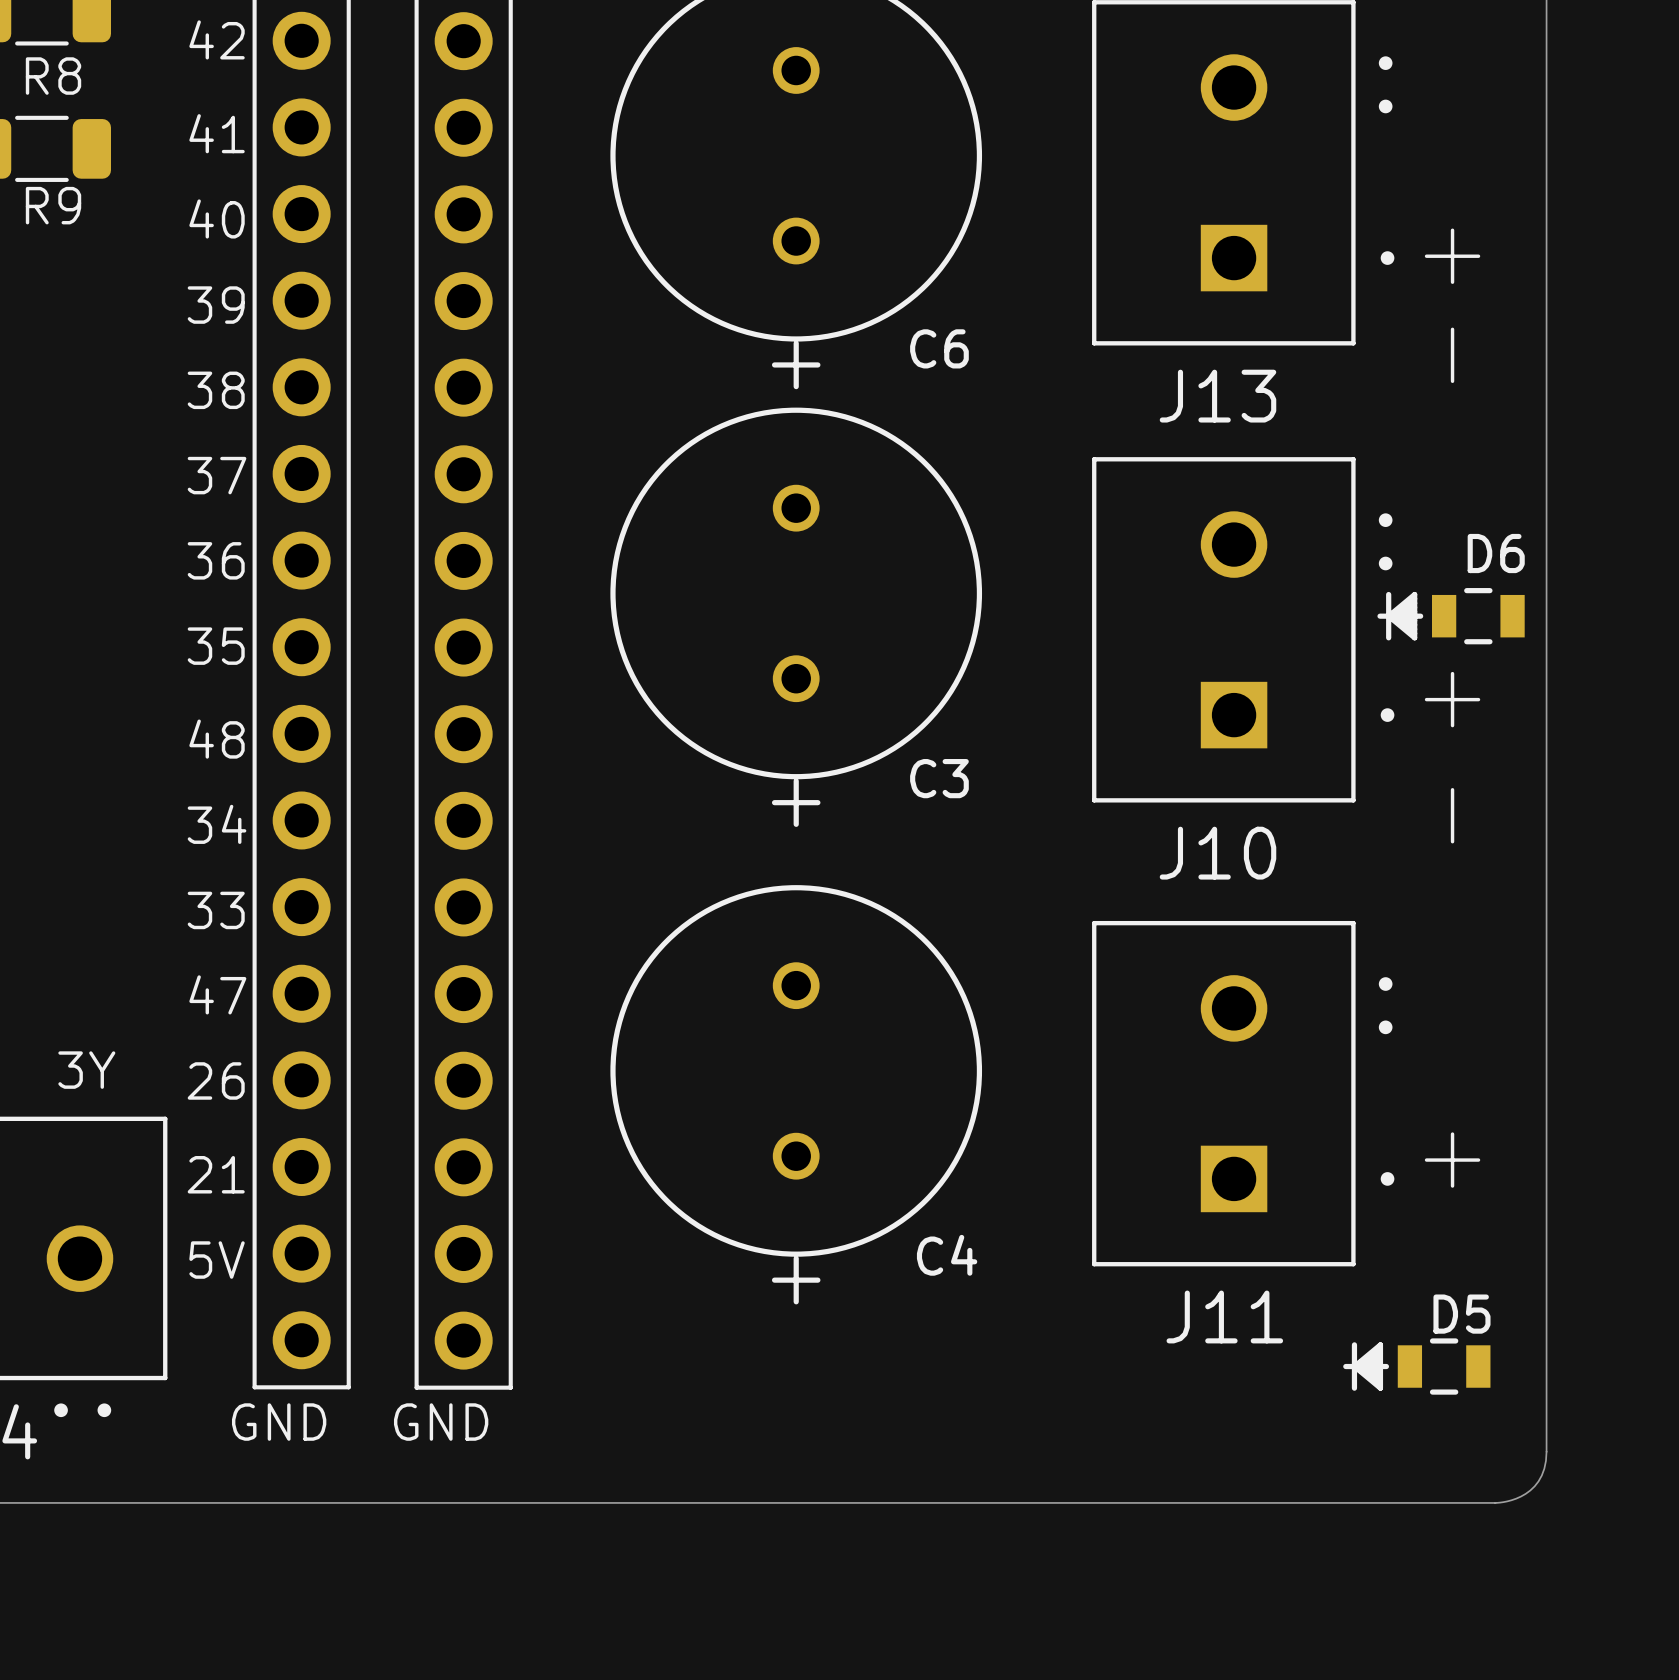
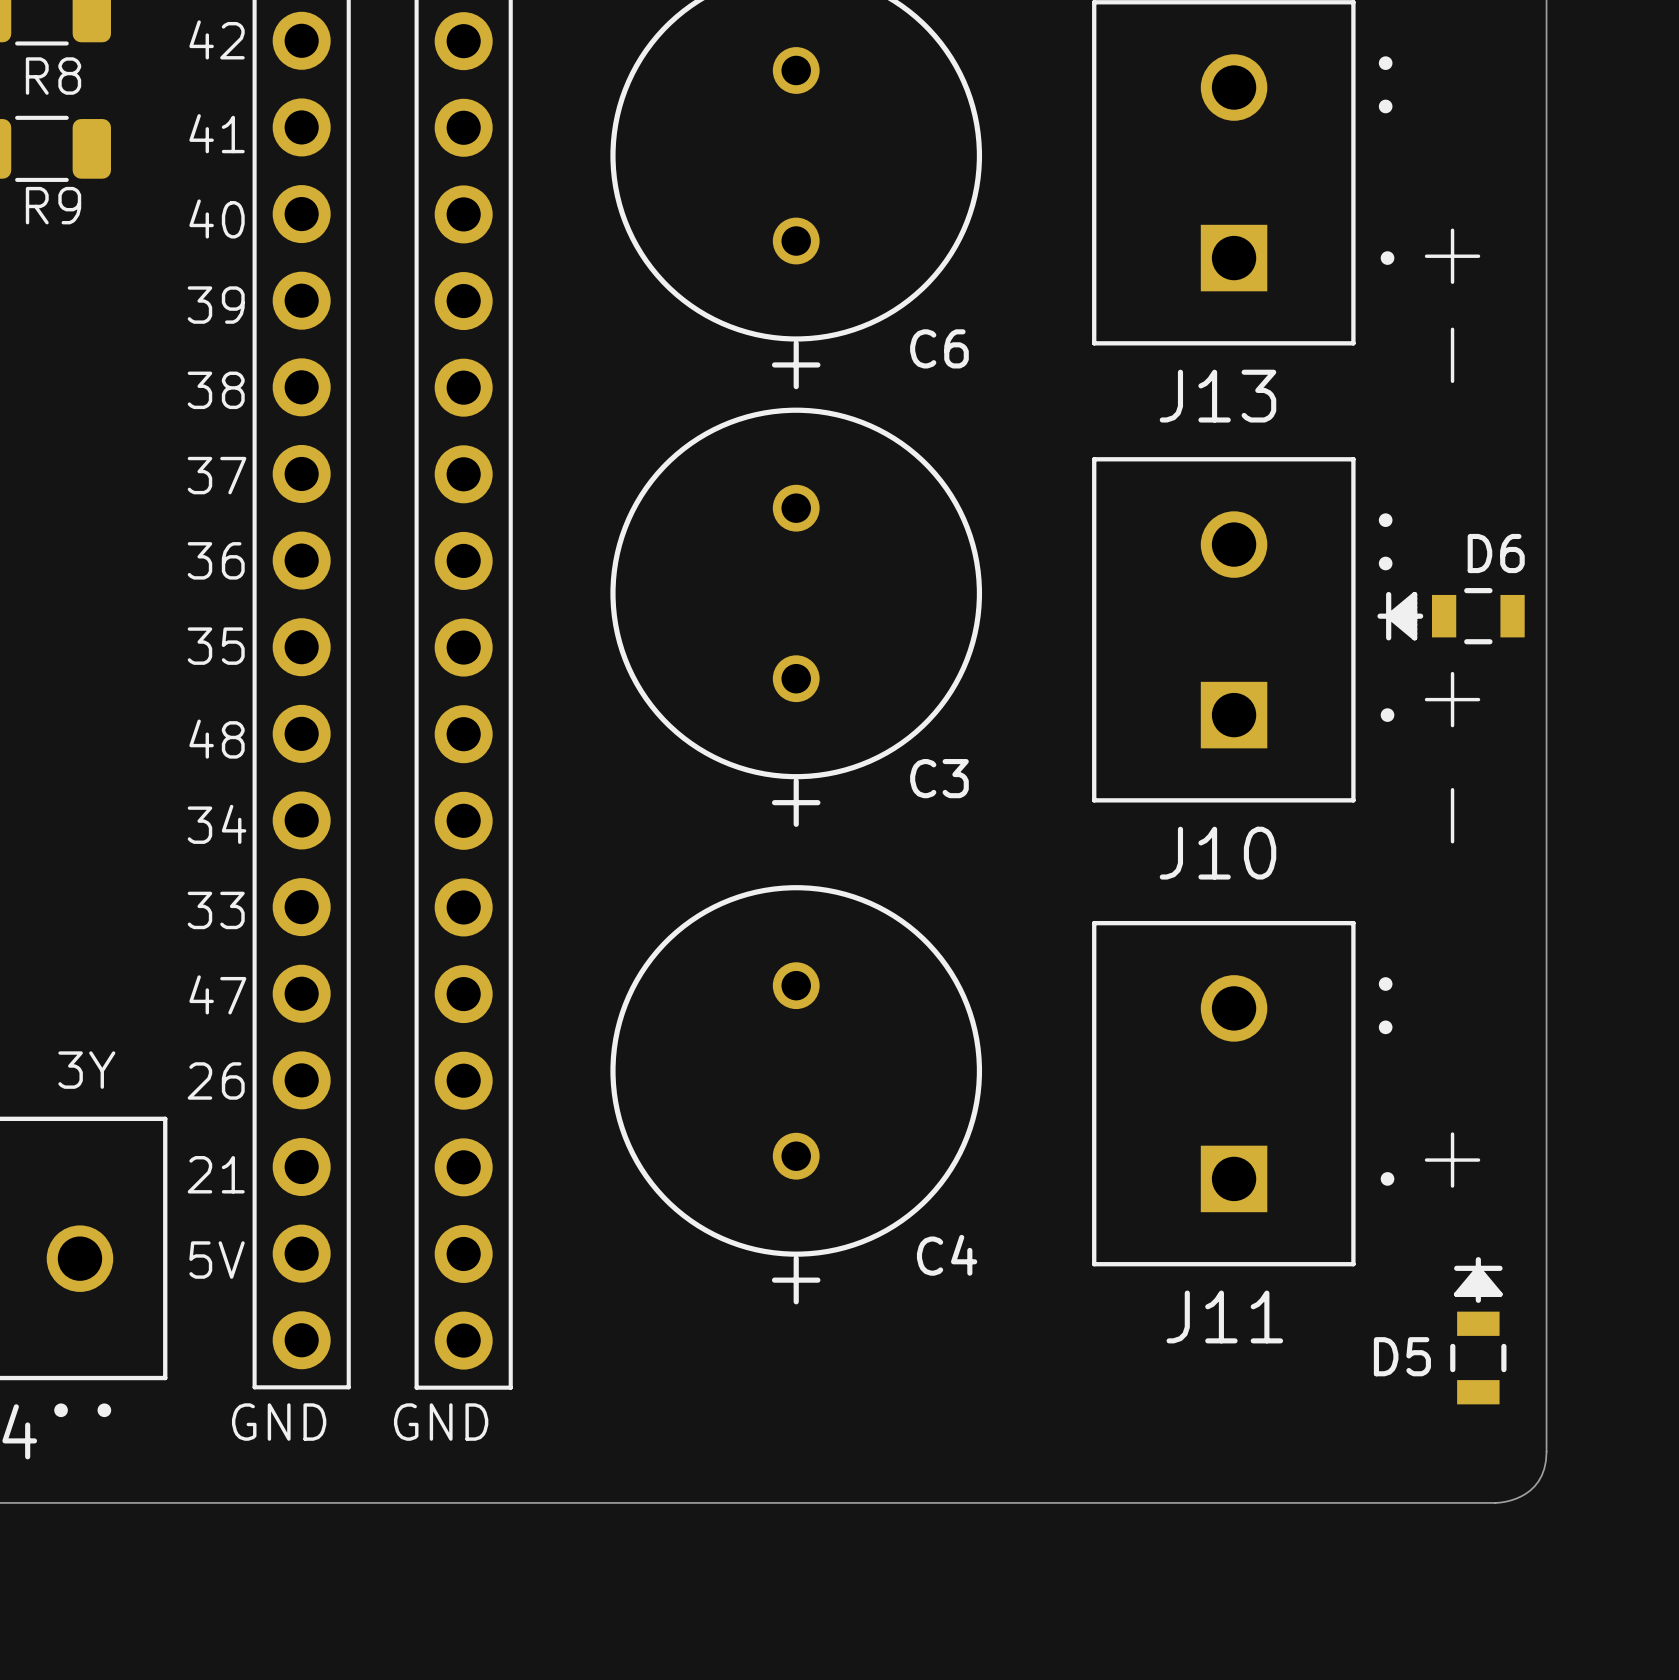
D5 name position: D5 (1461, 1314) -> D5 (1402, 1356)
D5 rotation: 0° (1416, 1366) -> 90° clockwise (1478, 1330)

